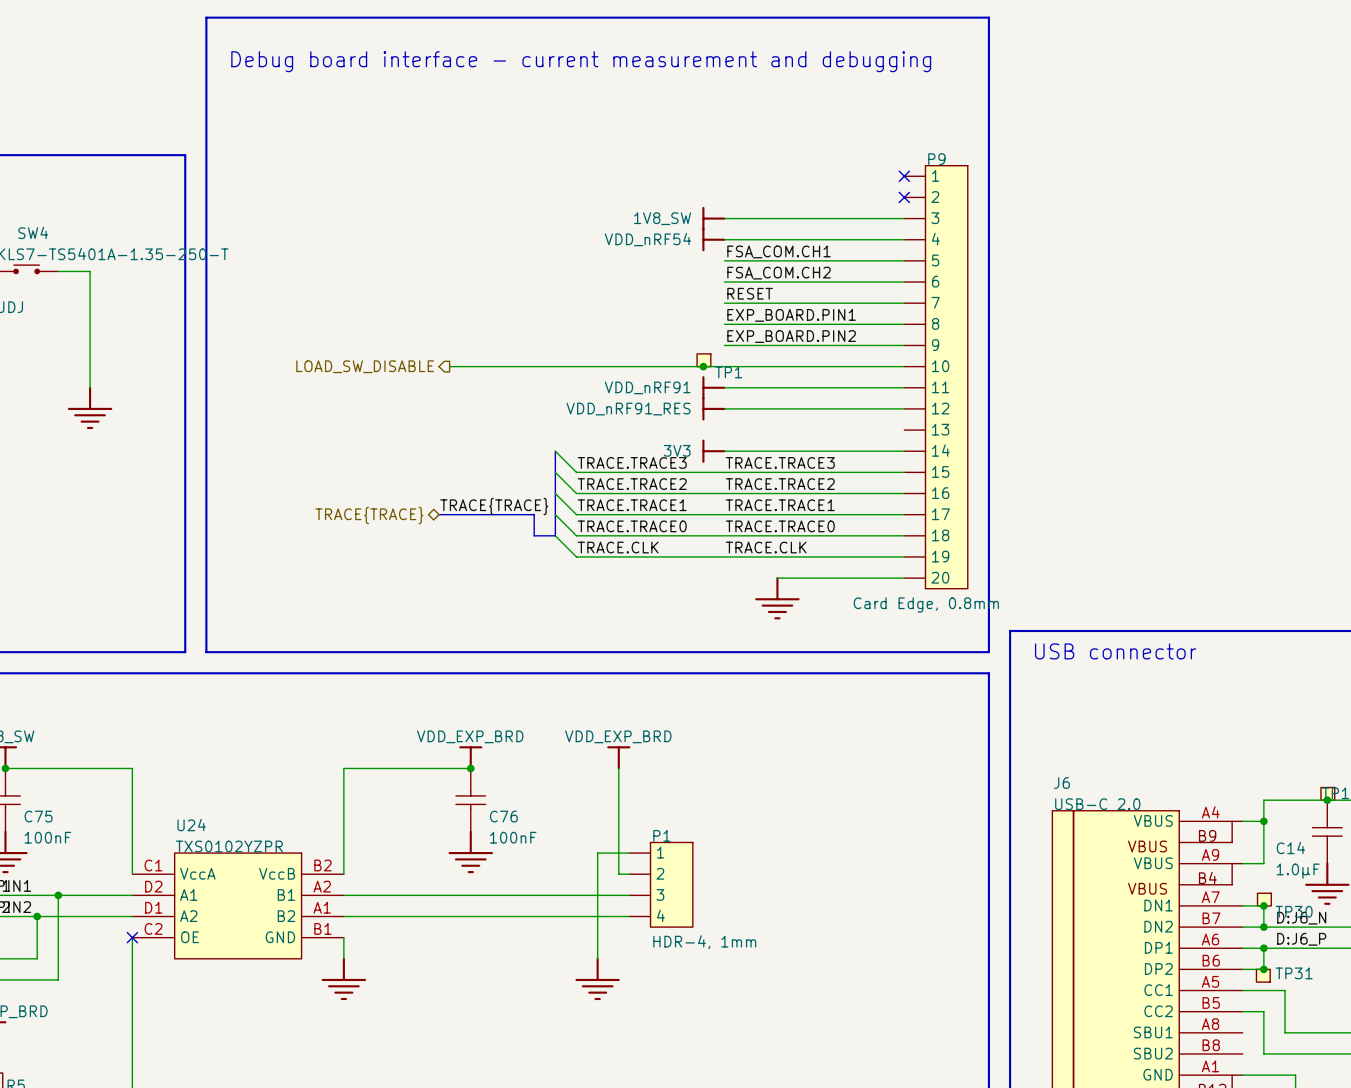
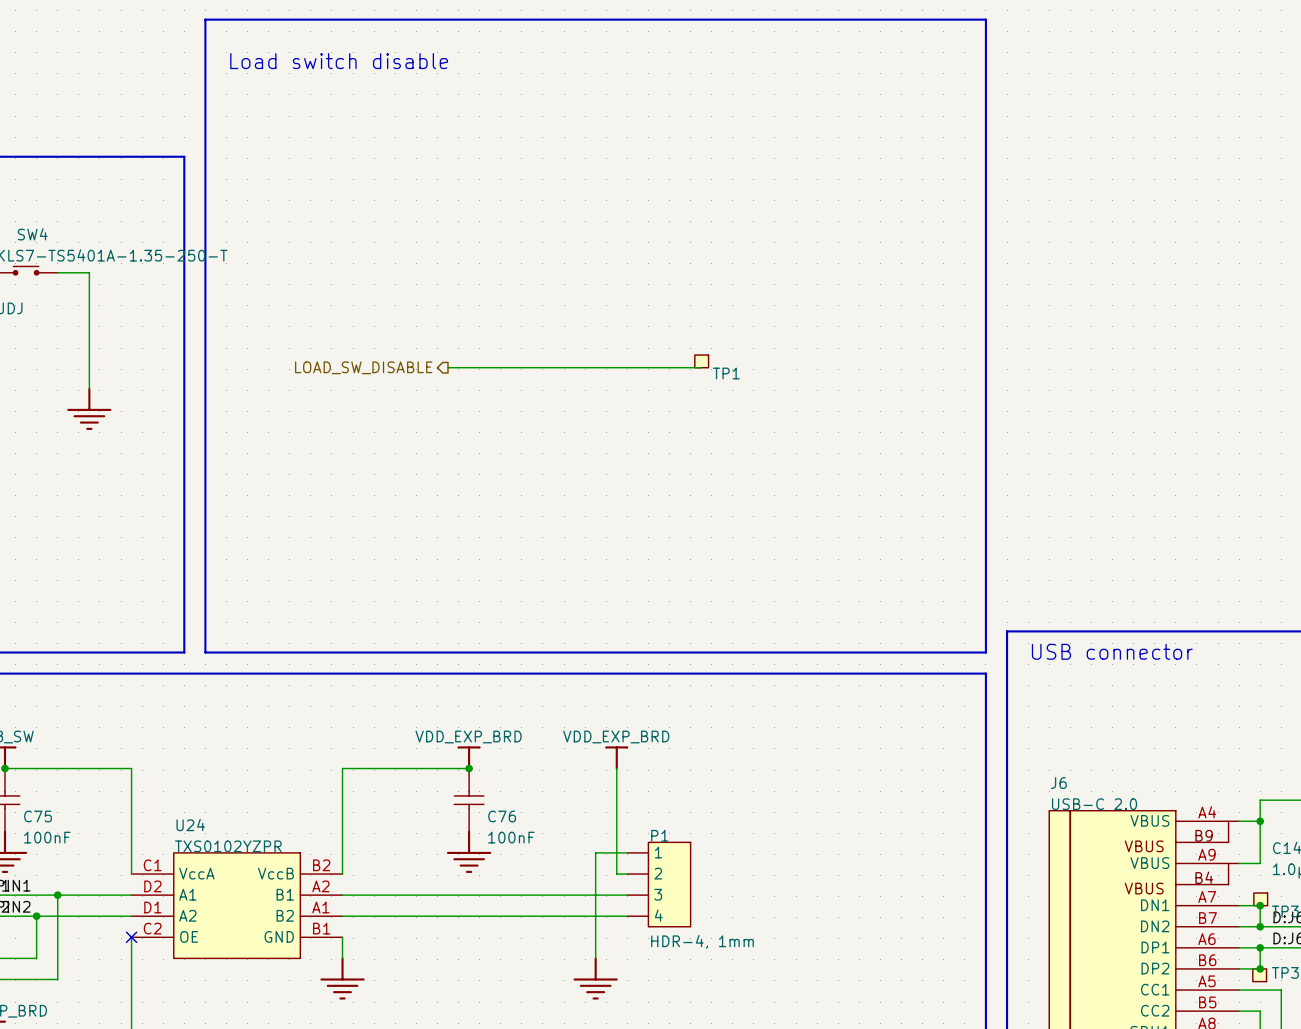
text: Debug board interface - current measurement and debugging (581, 61) -> Load switch disable (339, 61)
no-connect mark: (904, 176) -> none
no-connect mark: (904, 197) -> none
power symbol: 1V8_SW (713, 218) -> none
wire: (724, 218) (904, 218) -> none
power symbol: VDD_nRF54 (713, 239) -> none
wire: (724, 239) (904, 239) -> none
label: FSA_COM.CH1 (779, 251) -> none
wire: (724, 260) (904, 260) -> none
label: FSA_COM.CH2 (779, 273) -> none
wire: (724, 282) (904, 282) -> none
label: RESET (750, 293) -> none
wire: (724, 303) (904, 303) -> none
label: EXP_BOARD.PIN1 (791, 315) -> none
wire: (724, 324) (904, 324) -> none
label: EXP_BOARD.PIN2 (791, 336) -> none
wire: (724, 345) (904, 345) -> none
wire: (703, 366) (904, 366) -> none
junction: (703, 366) -> none
P9: Card Edge, 0.8mm (936, 377) -> none
power symbol: VDD_nRF91 (713, 387) -> none
wire: (724, 387) (904, 387) -> none
power symbol: VDD_nRF91_RES (713, 408) -> none
wire: (724, 408) (904, 408) -> none
wire: (555, 451) (576, 472) (904, 472) -> none
bus: (555, 451) (555, 535) (534, 535) (534, 514) (439, 514) -> none
power symbol: 3V3 (713, 451) -> none
wire: (724, 451) (904, 451) -> none
label: TRACE.TRACE3 (632, 462) -> none
label: TRACE.TRACE3 (780, 462) -> none
wire: (555, 472) (576, 493) (904, 493) -> none
label: TRACE.TRACE2 (632, 484) -> none
label: TRACE.TRACE2 (780, 484) -> none
wire: (555, 493) (576, 514) (904, 514) -> none
label: TRACE.TRACE1 (632, 505) -> none
label: TRACE.TRACE1 (780, 505) -> none
label: TRACE{TRACE} (494, 506) -> none
wire: (555, 514) (576, 535) (904, 535) -> none
hierarchical label: TRACE{TRACE} (369, 515) -> none
label: TRACE.TRACE0 (632, 526) -> none
label: TRACE.TRACE0 (780, 526) -> none
wire: (555, 535) (576, 556) (904, 556) -> none
label: TRACE.CLK (618, 547) -> none
label: TRACE.CLK (766, 547) -> none
wire: (777, 578) (904, 578) -> none
power symbol: (777, 598) -> none

